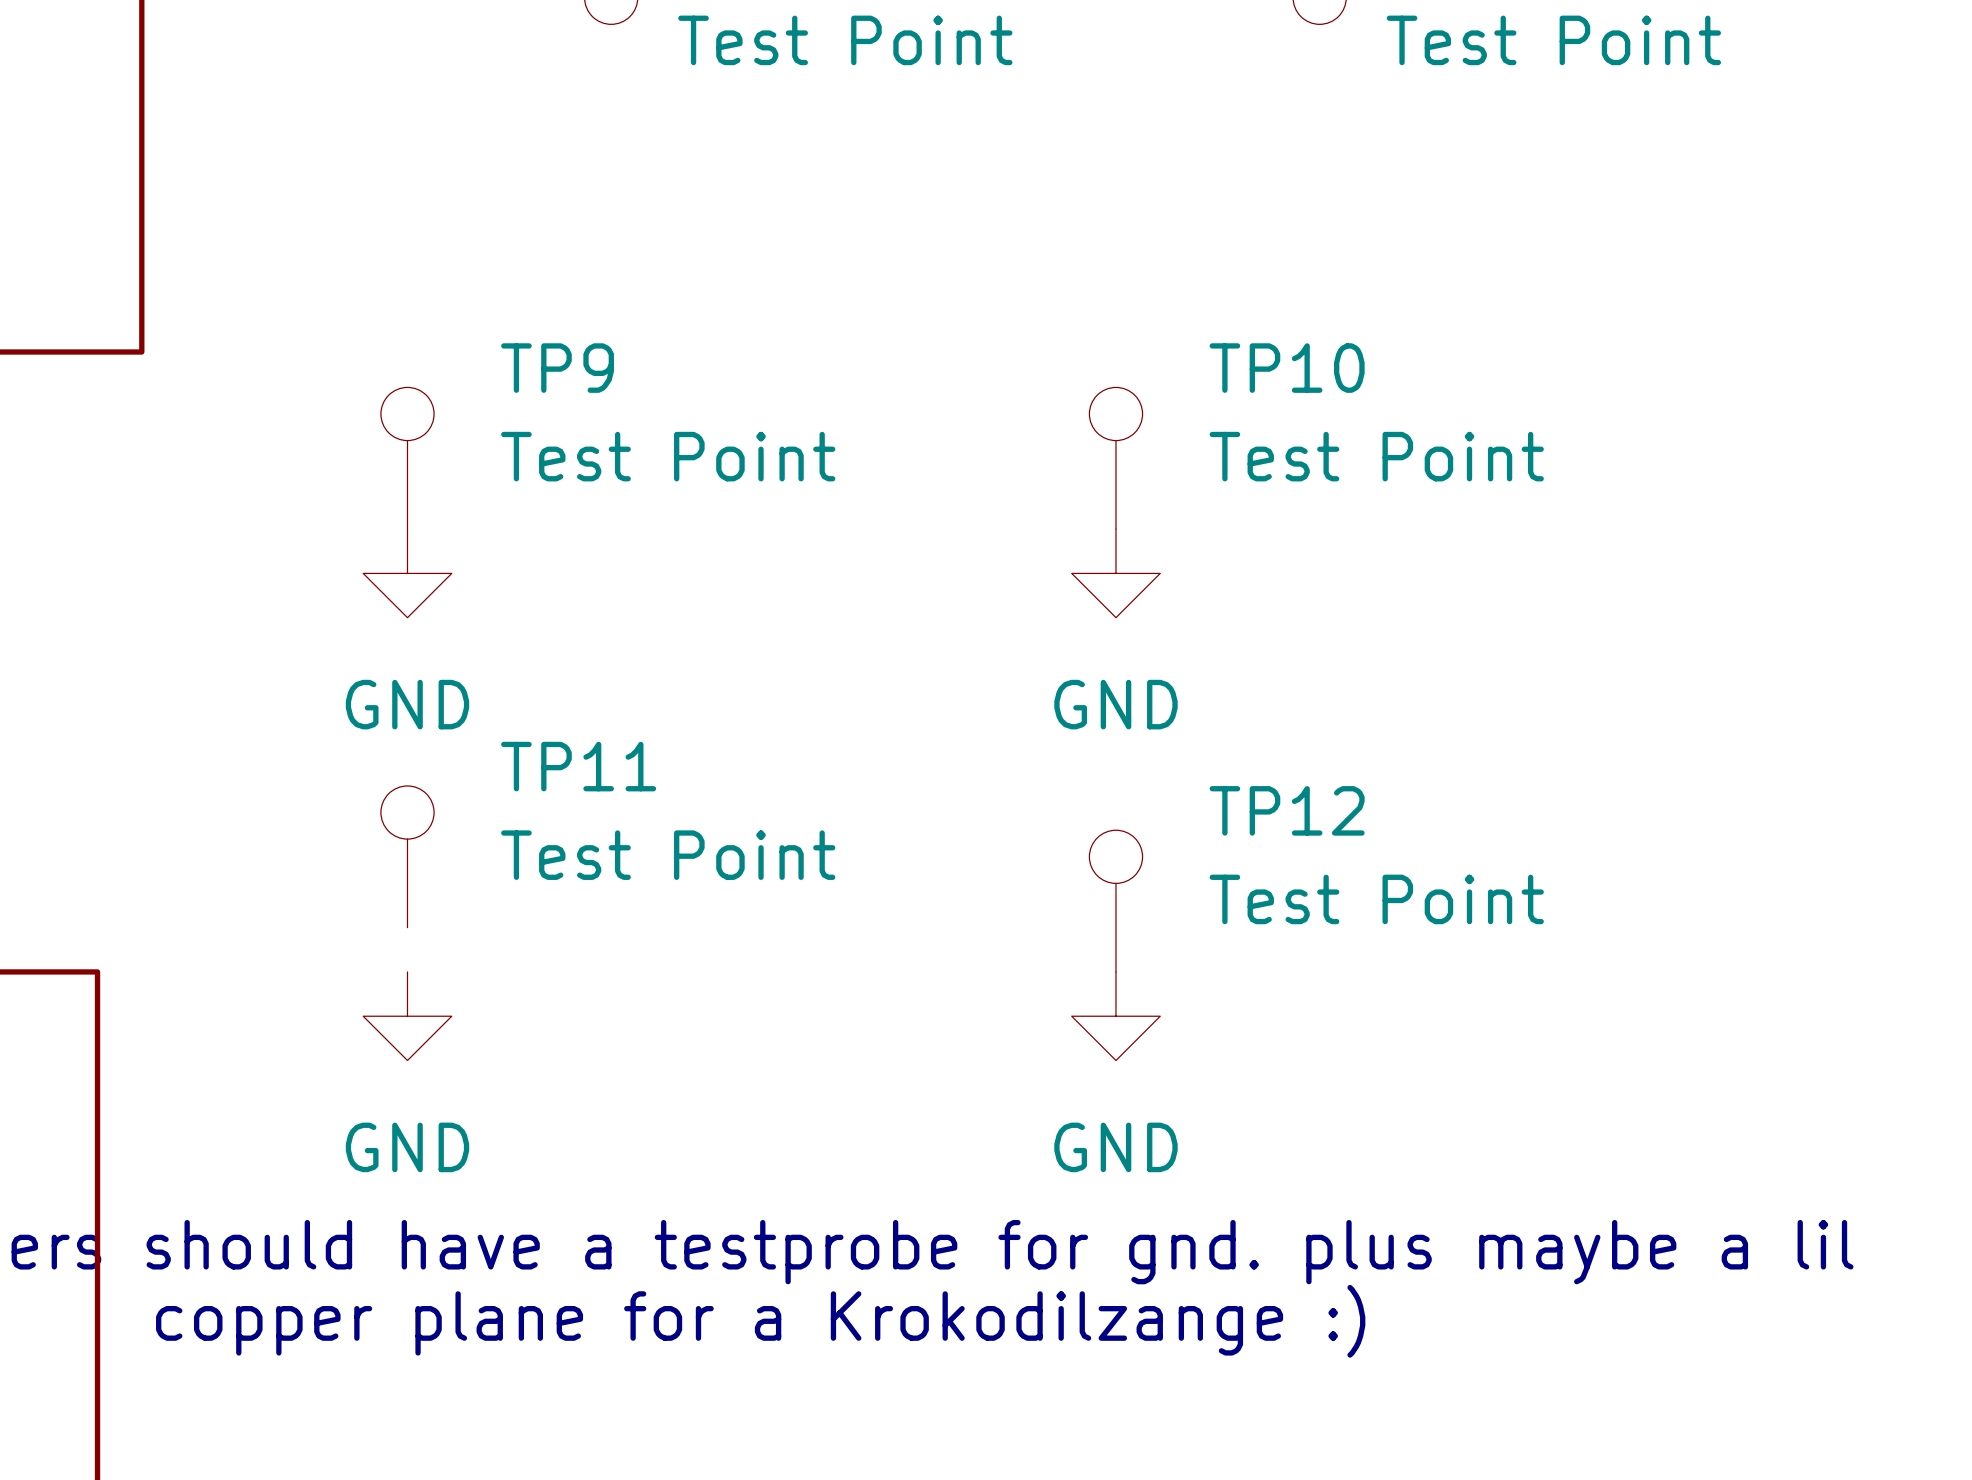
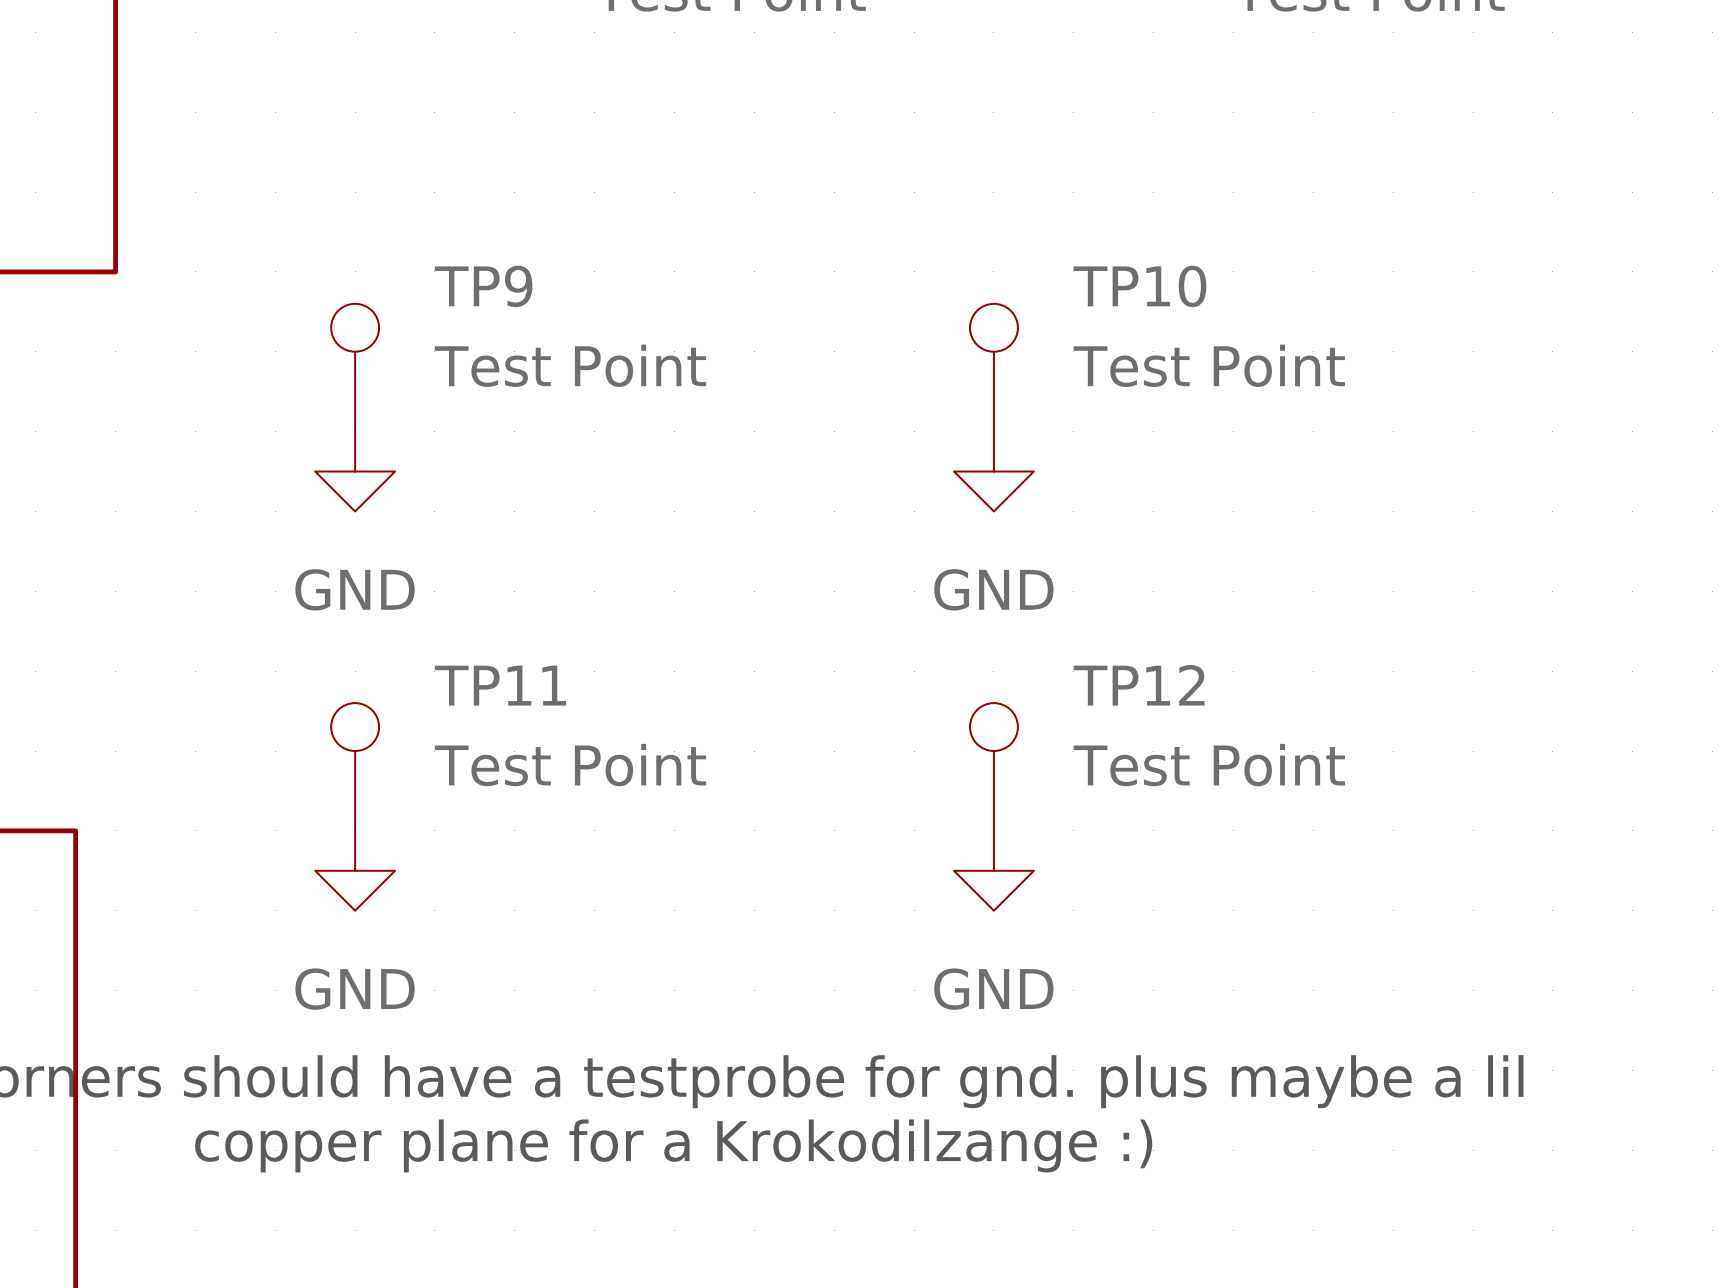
TP11 position: (407, 856) -> (355, 766)

